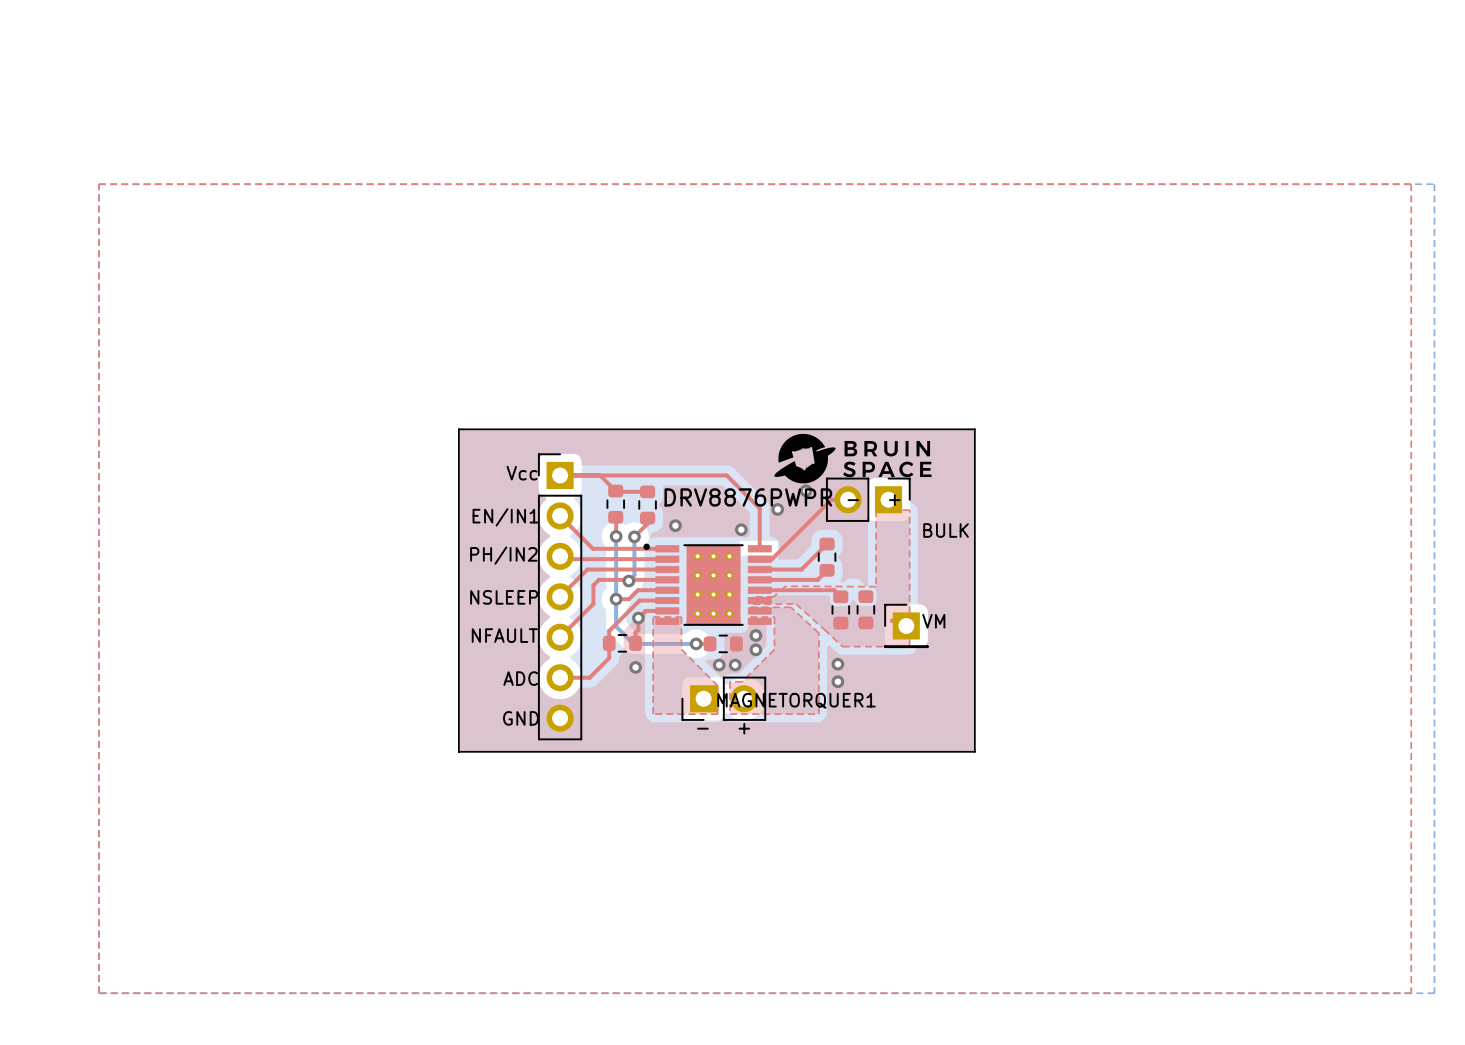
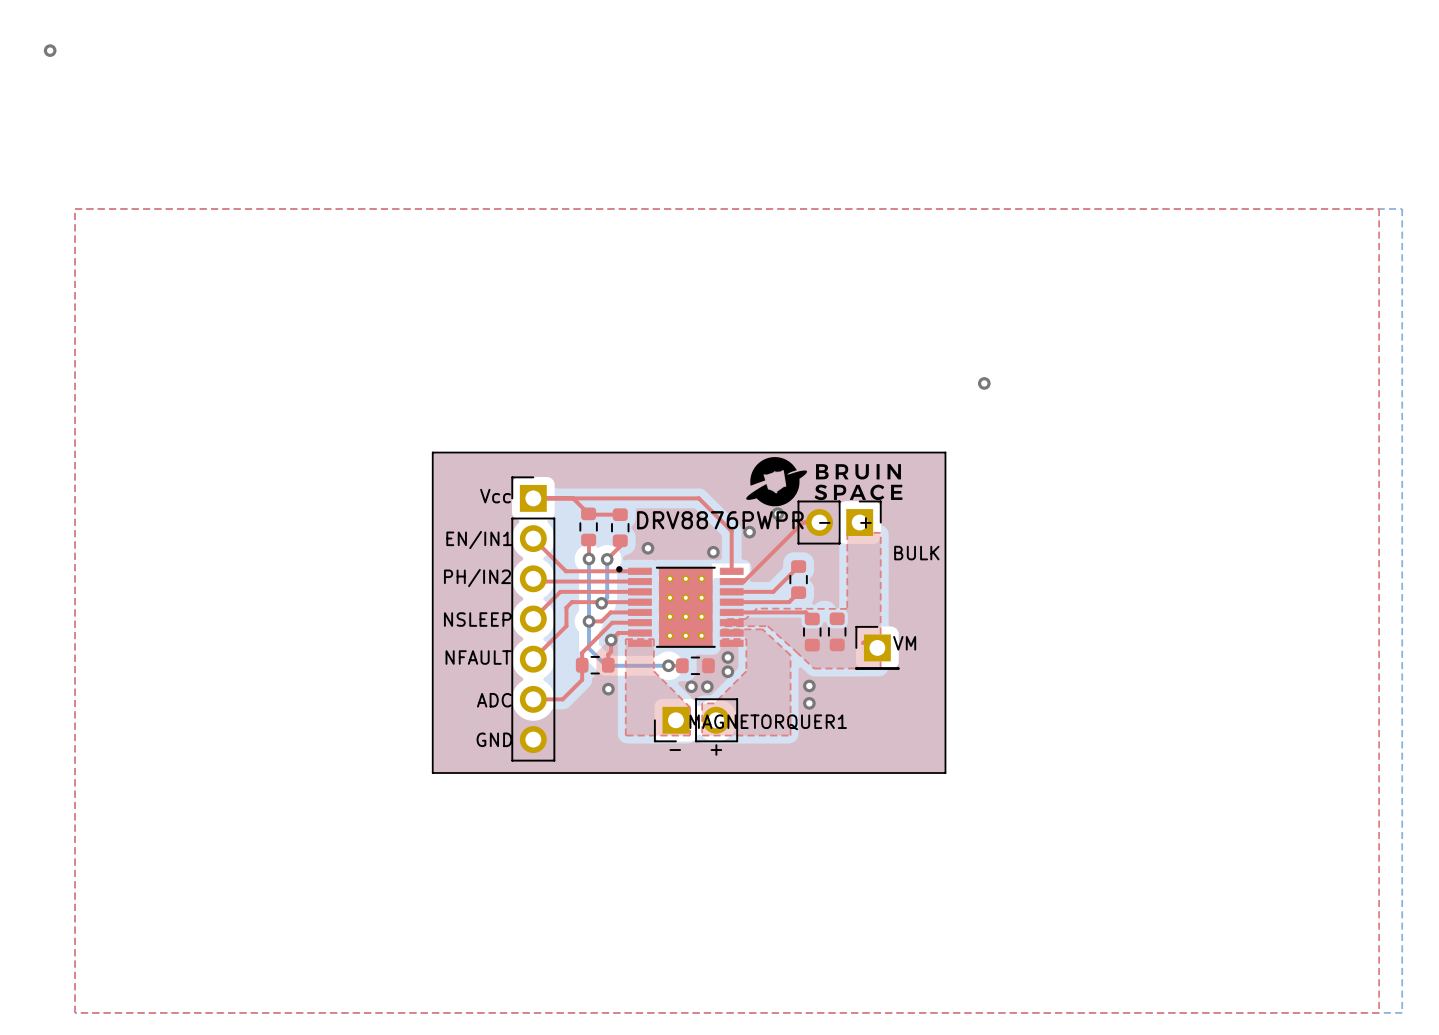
via: none -> (50, 50)
via: none -> (984, 383)

